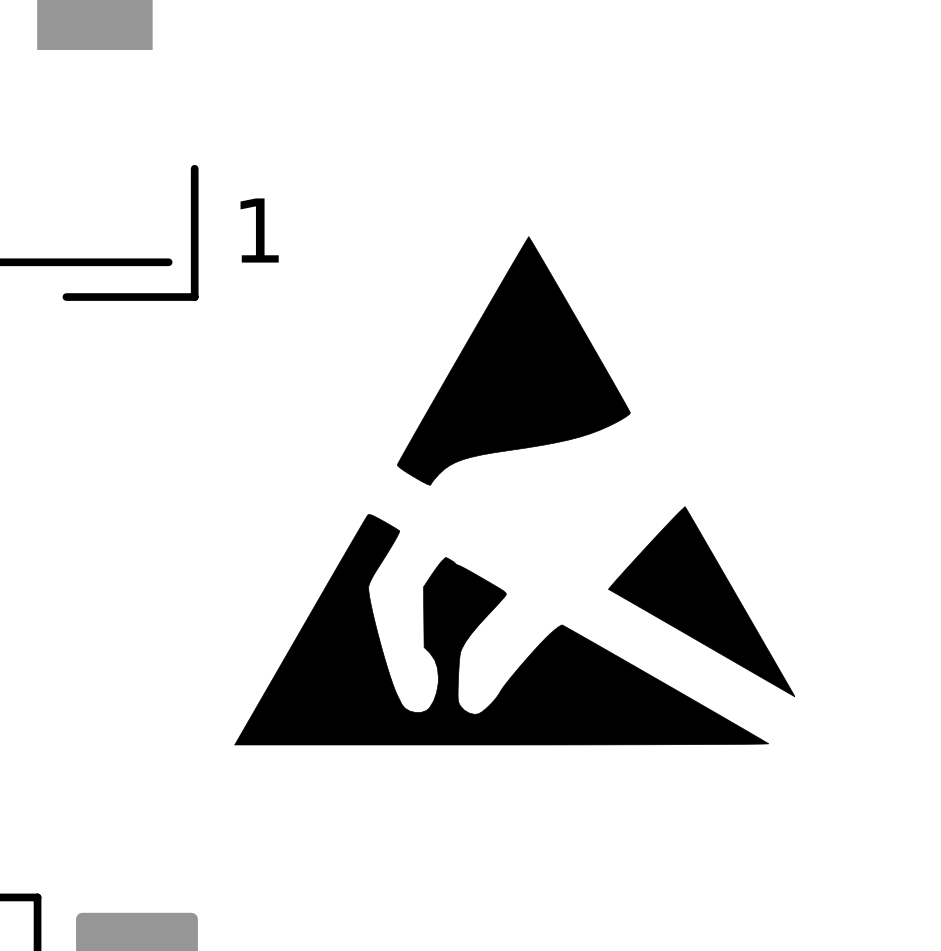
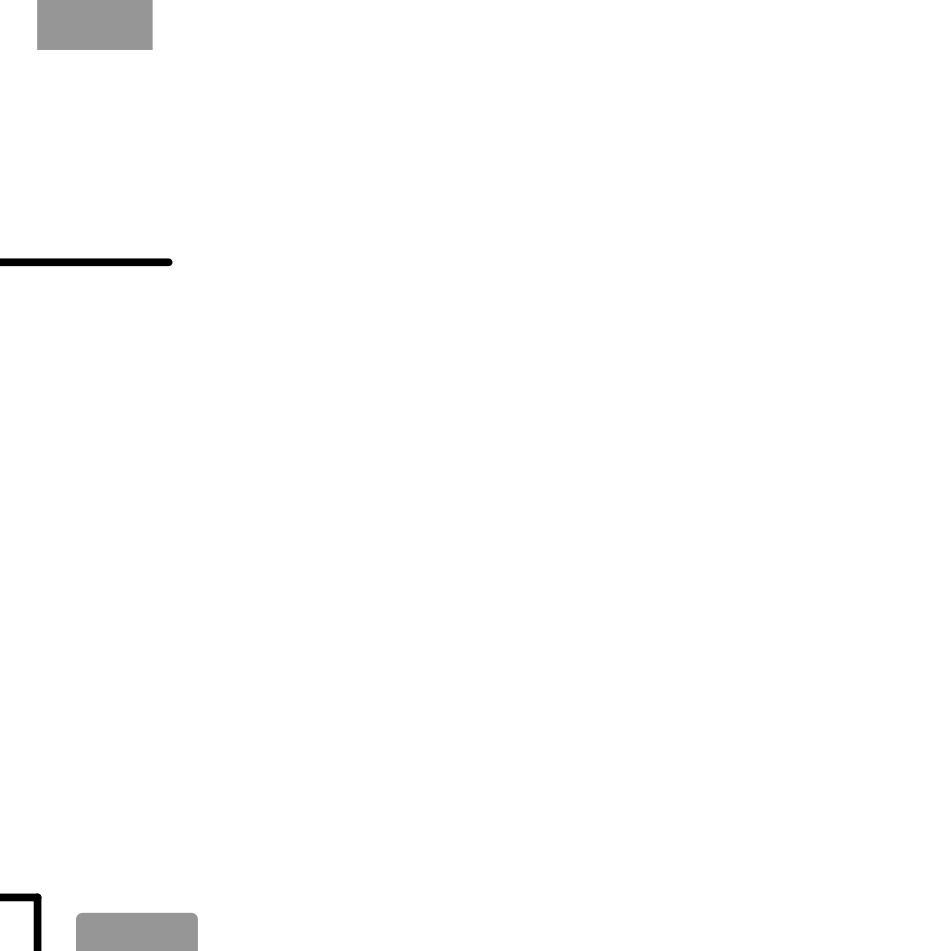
line: (194, 168) (194, 297) (66, 297) -> none
text: 1 (259, 230) -> none
drawing: [234, 236, 796, 746] -> none

